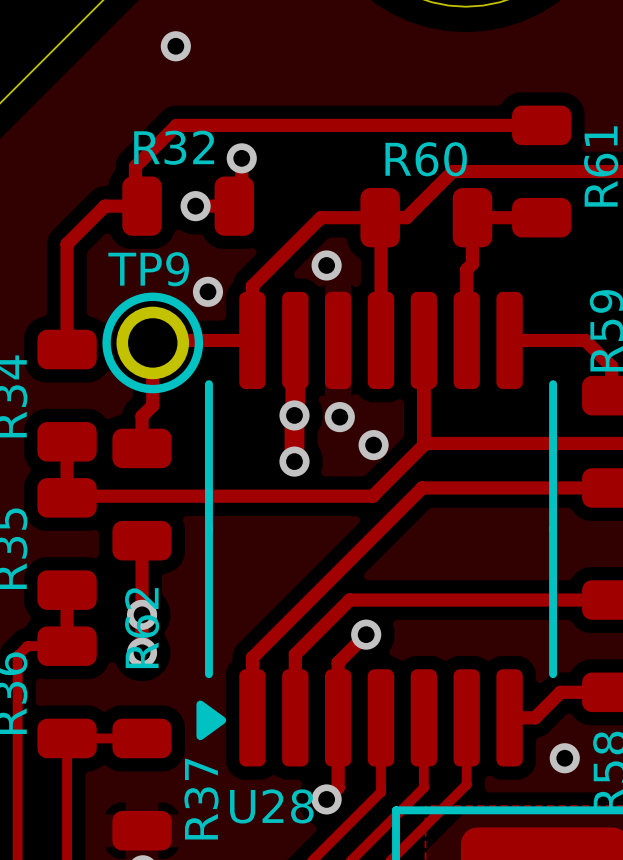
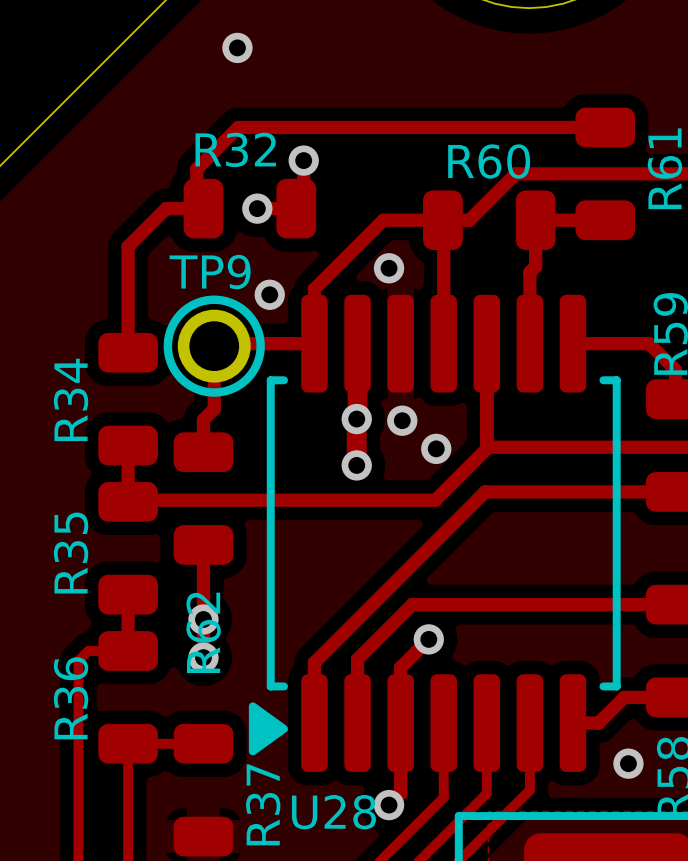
U28 footprint: [196, 291, 558, 767] -> [248, 294, 621, 772]

